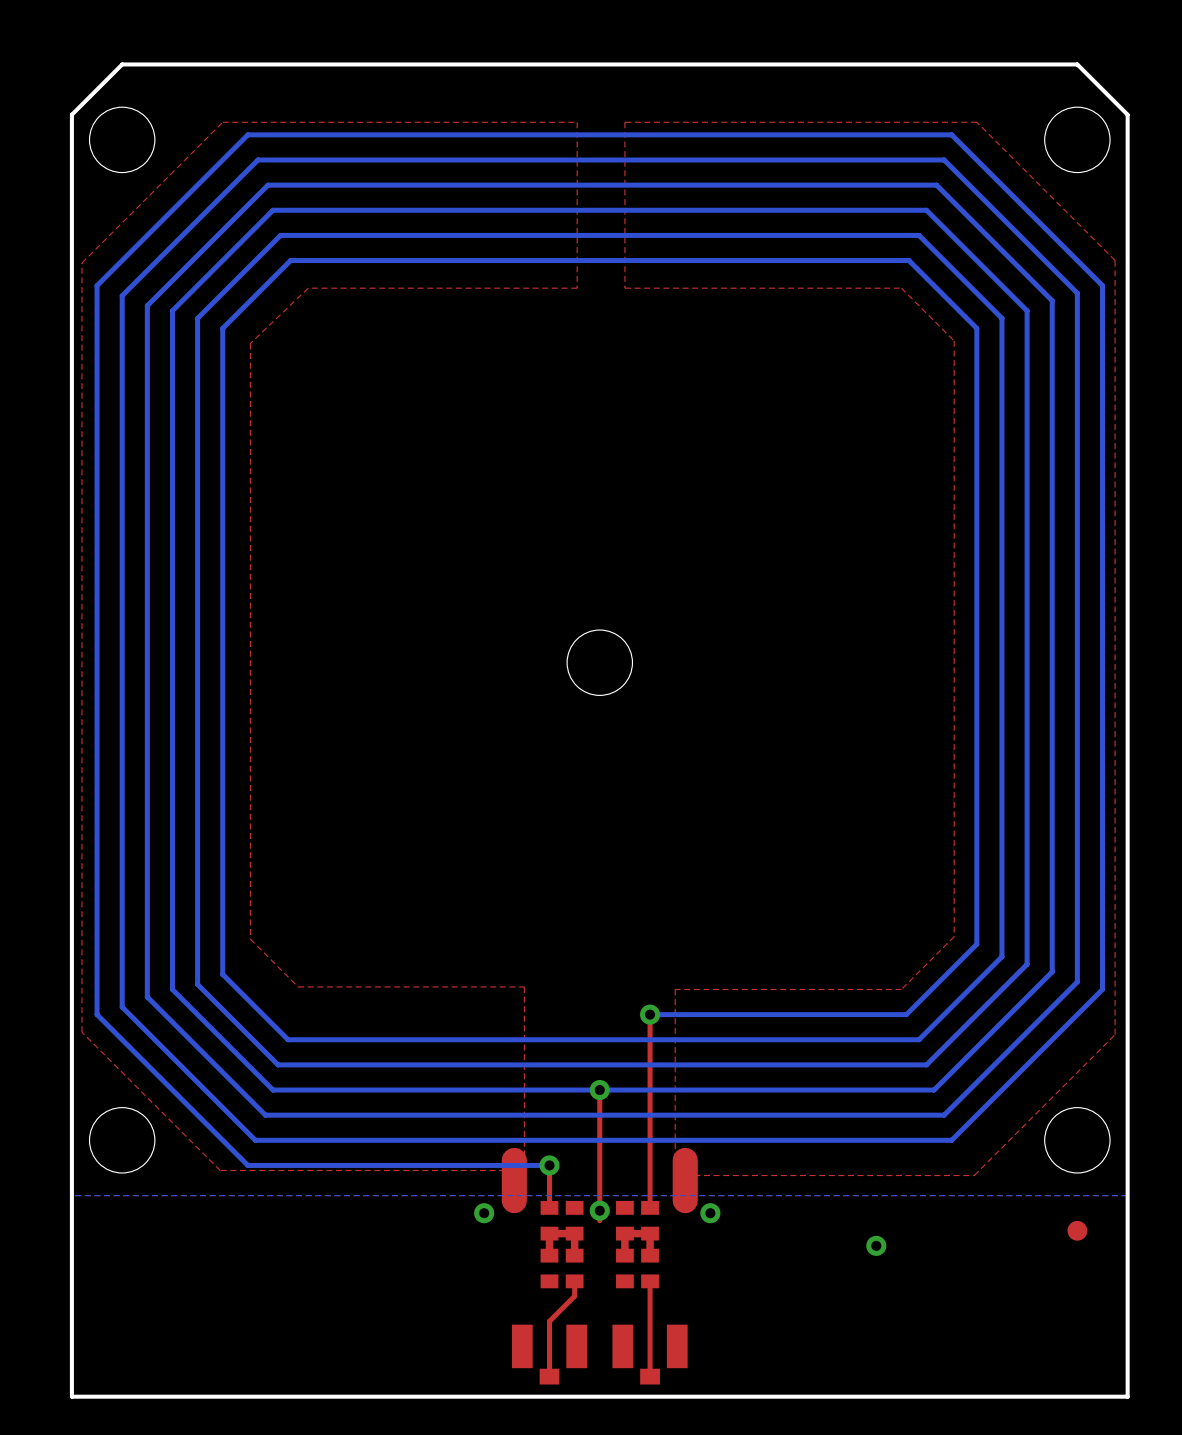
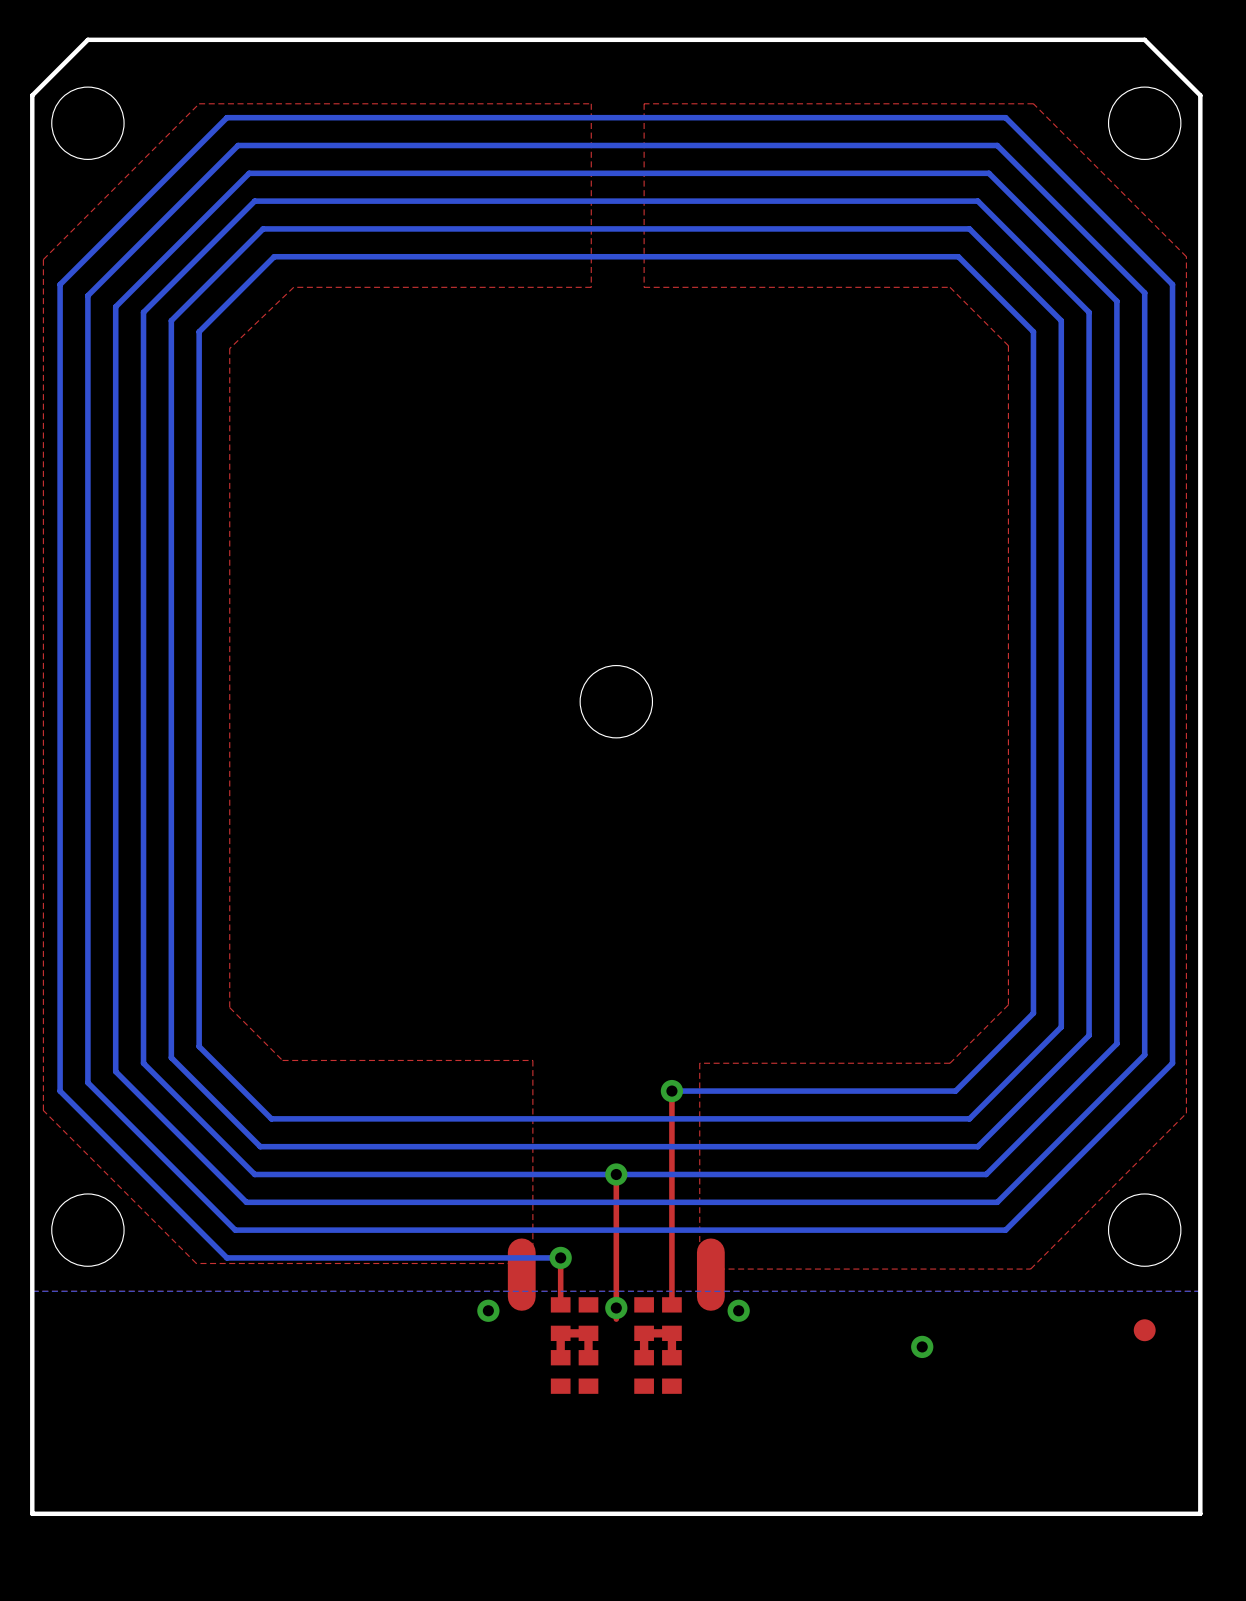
top track: (574, 1281) (574, 1296) (549, 1321) (549, 1376) -> none
top track: (650, 1281) (650, 1376) -> none
part: (549, 1354) -> none
part: (650, 1354) -> none

